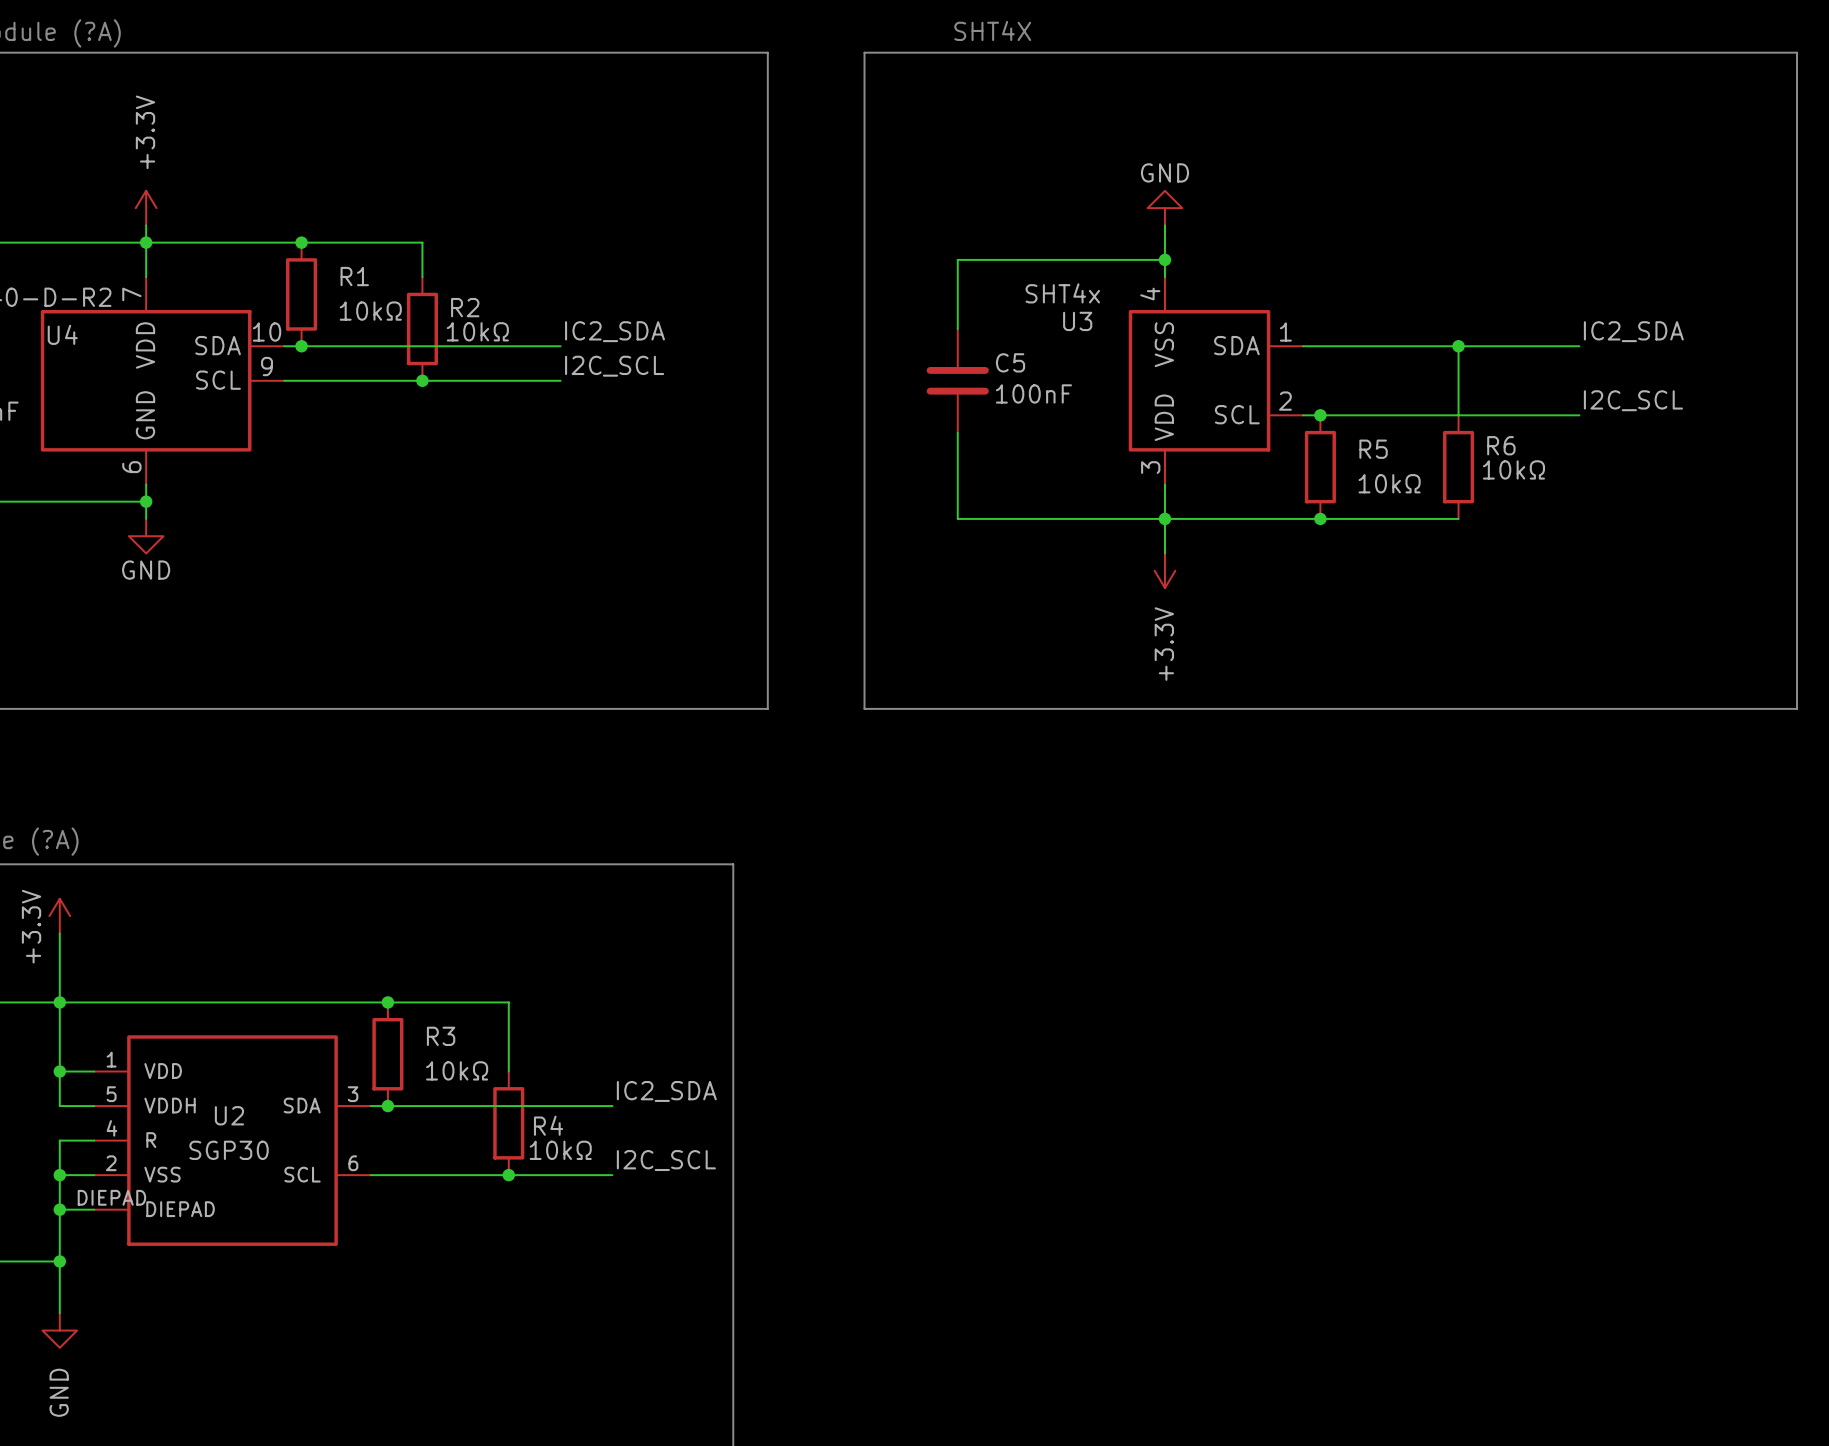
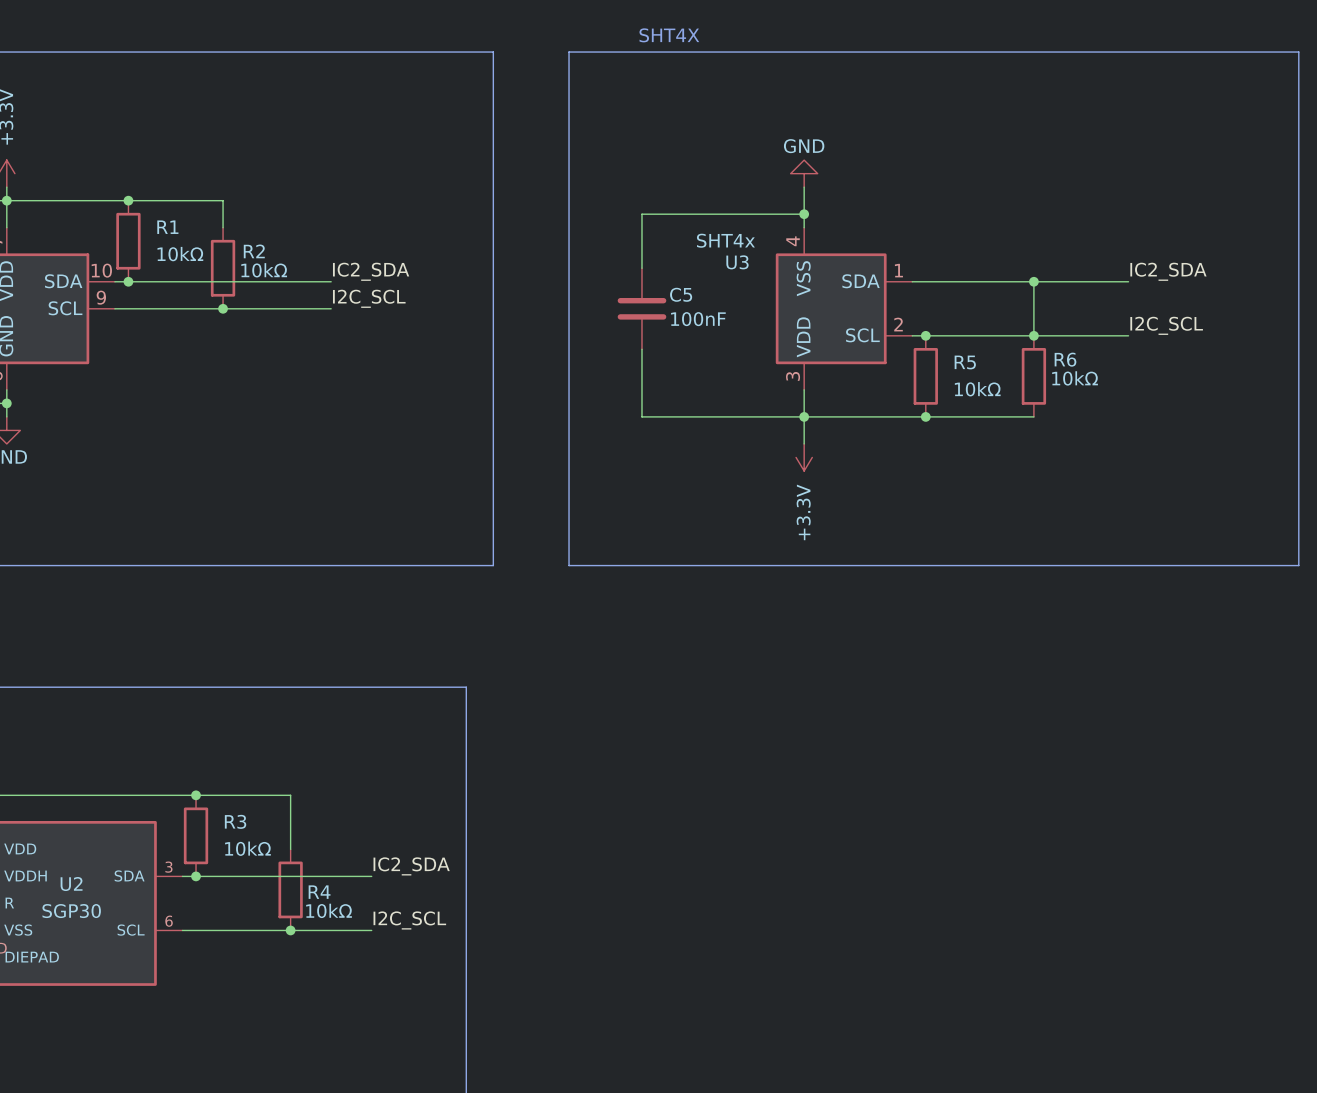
junction: none -> (1033, 335)

